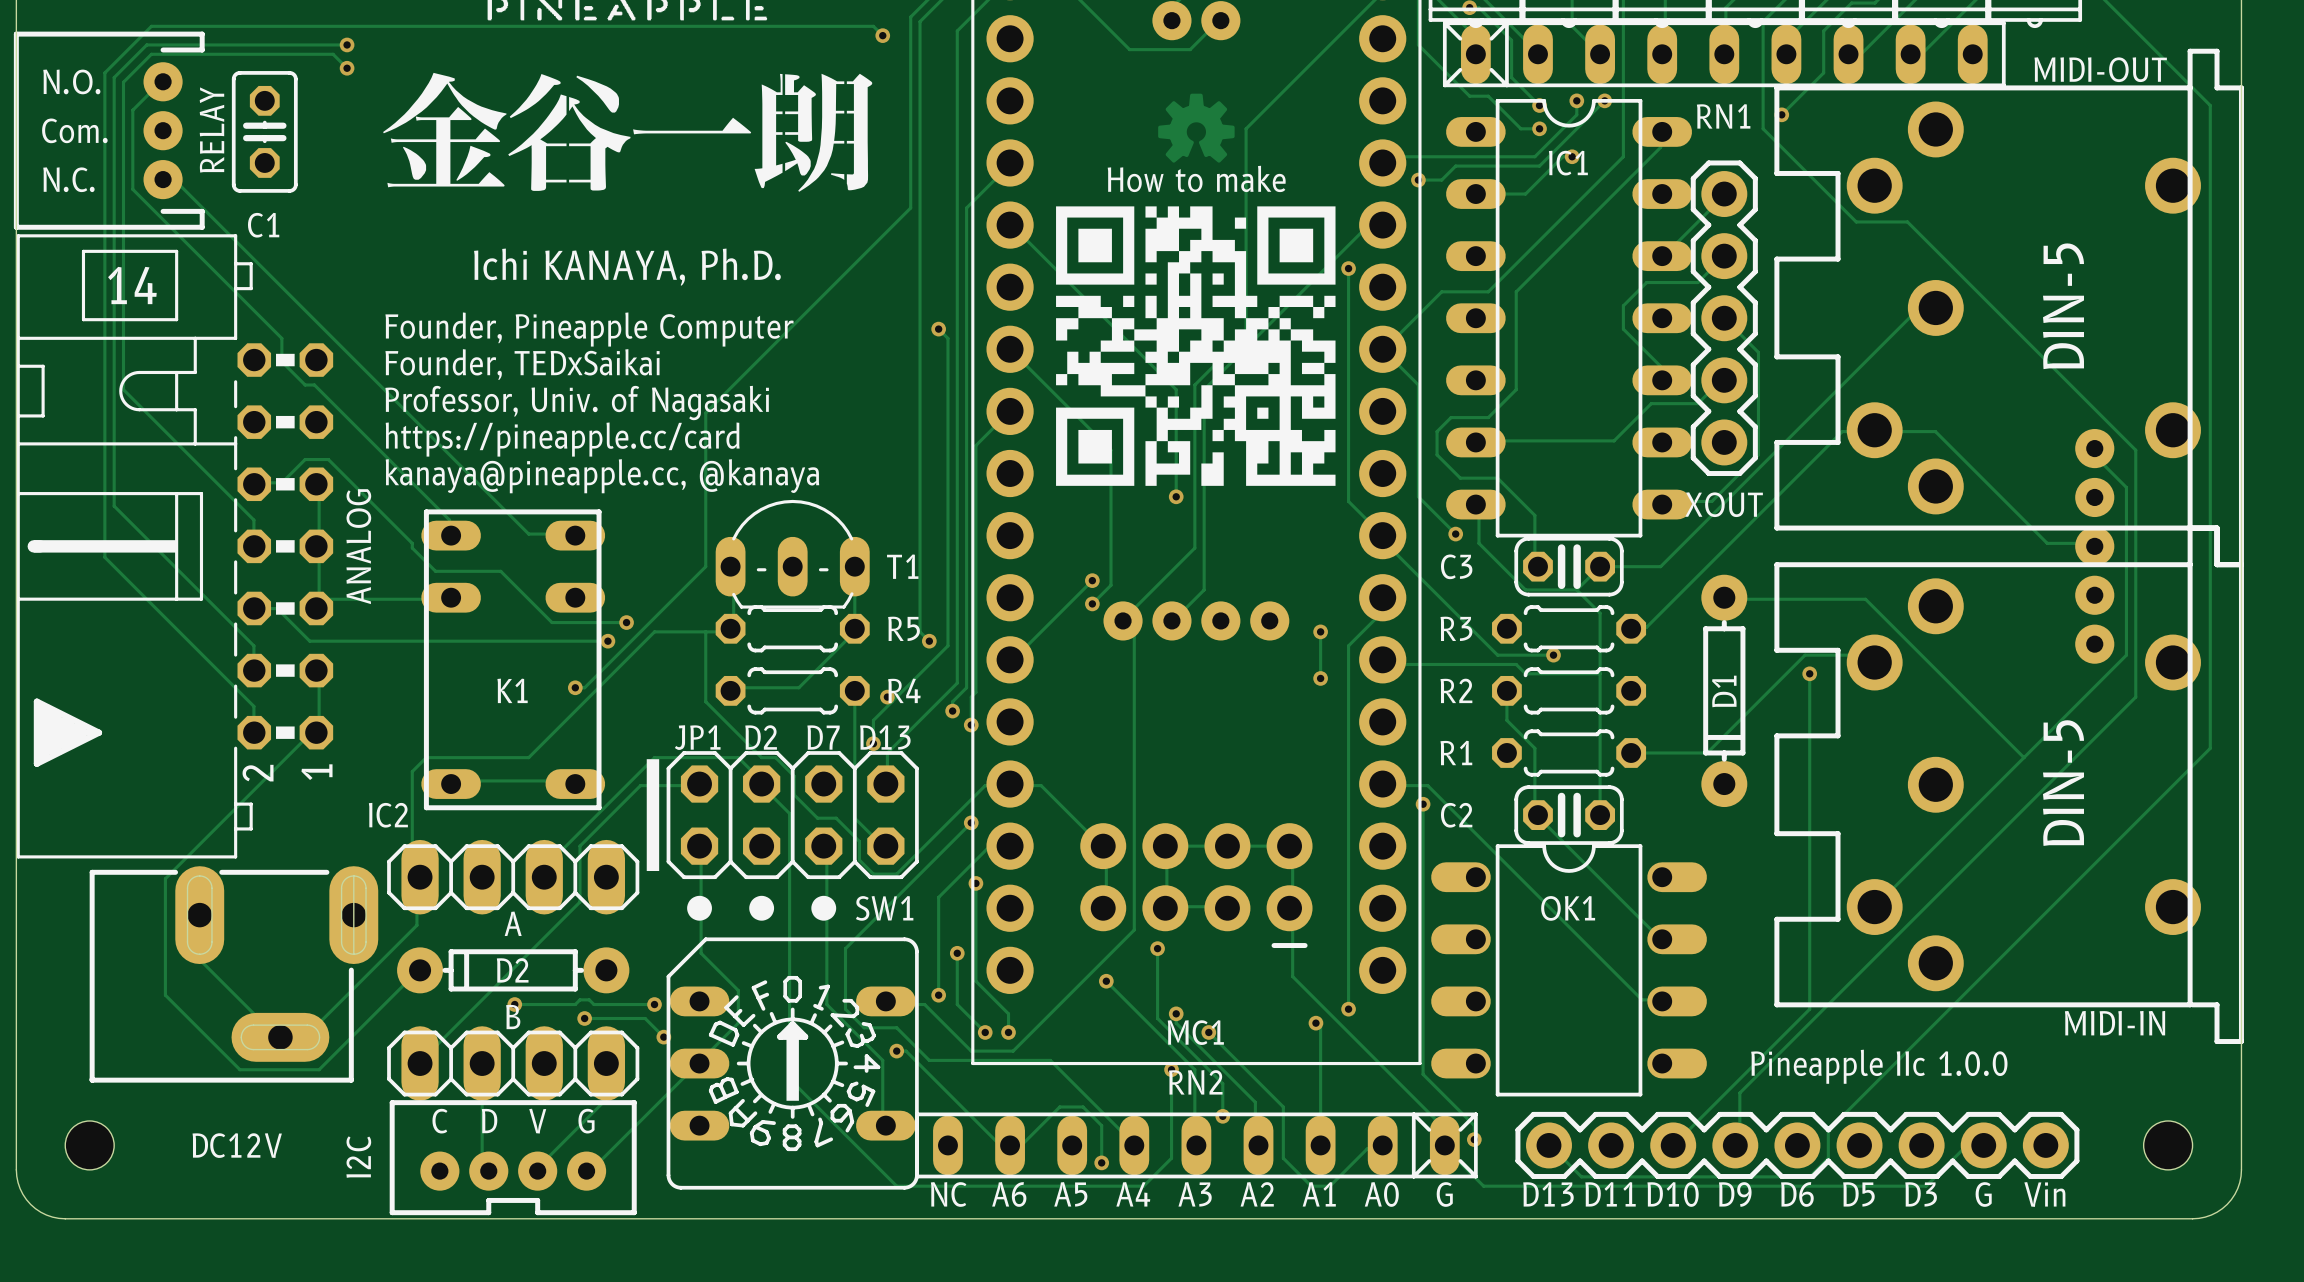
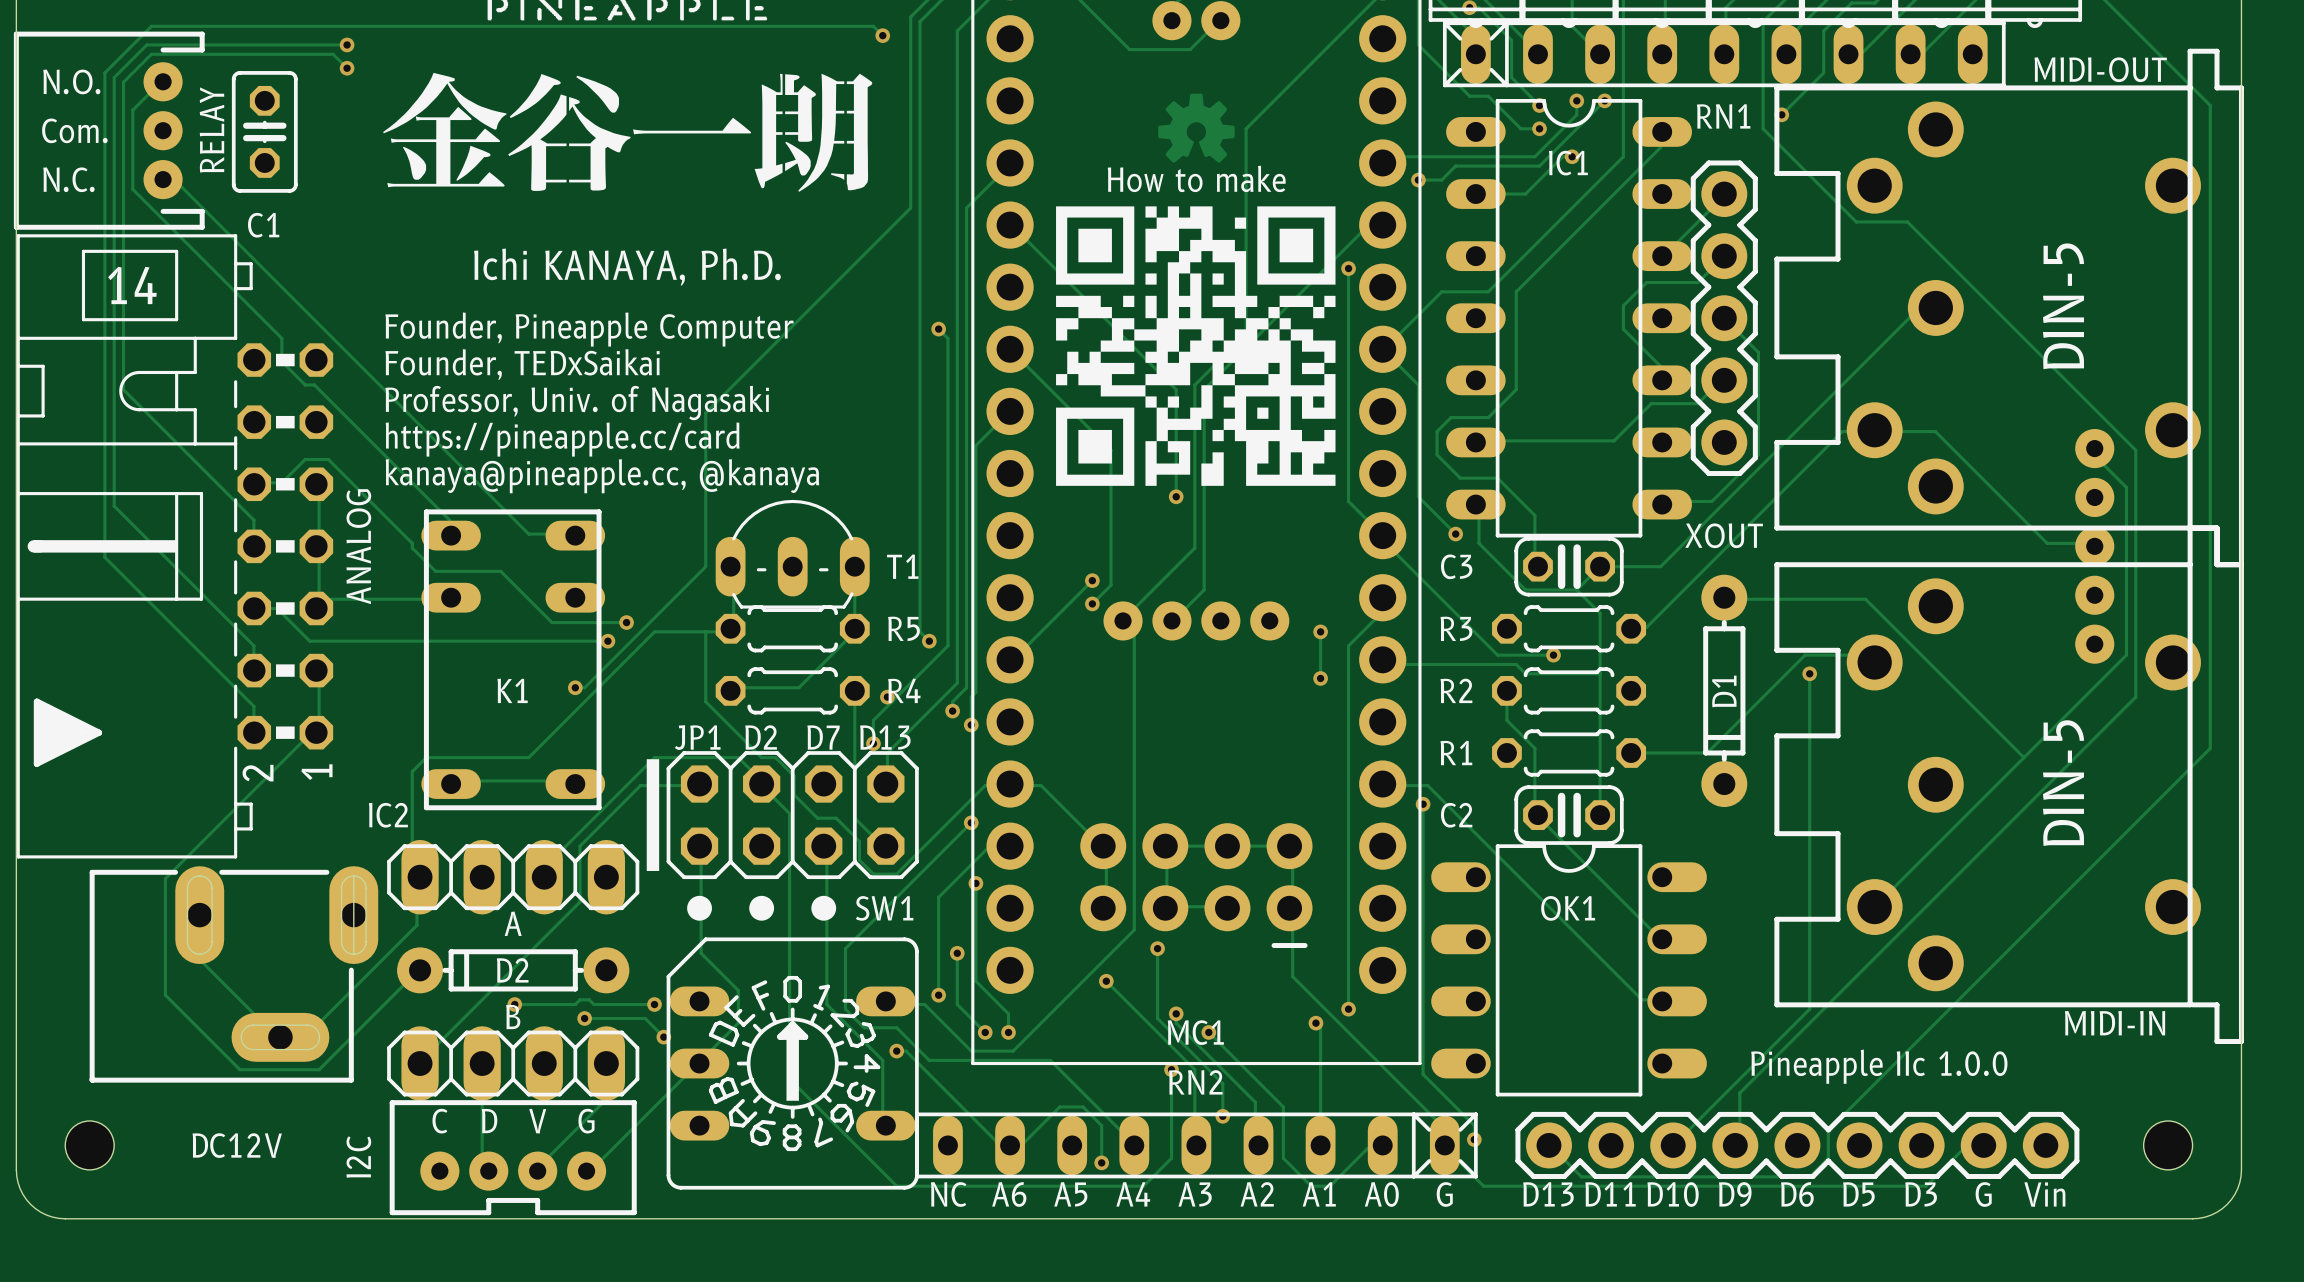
XOUT name position: XOUT (1724, 504) -> XOUT (1724, 535)

